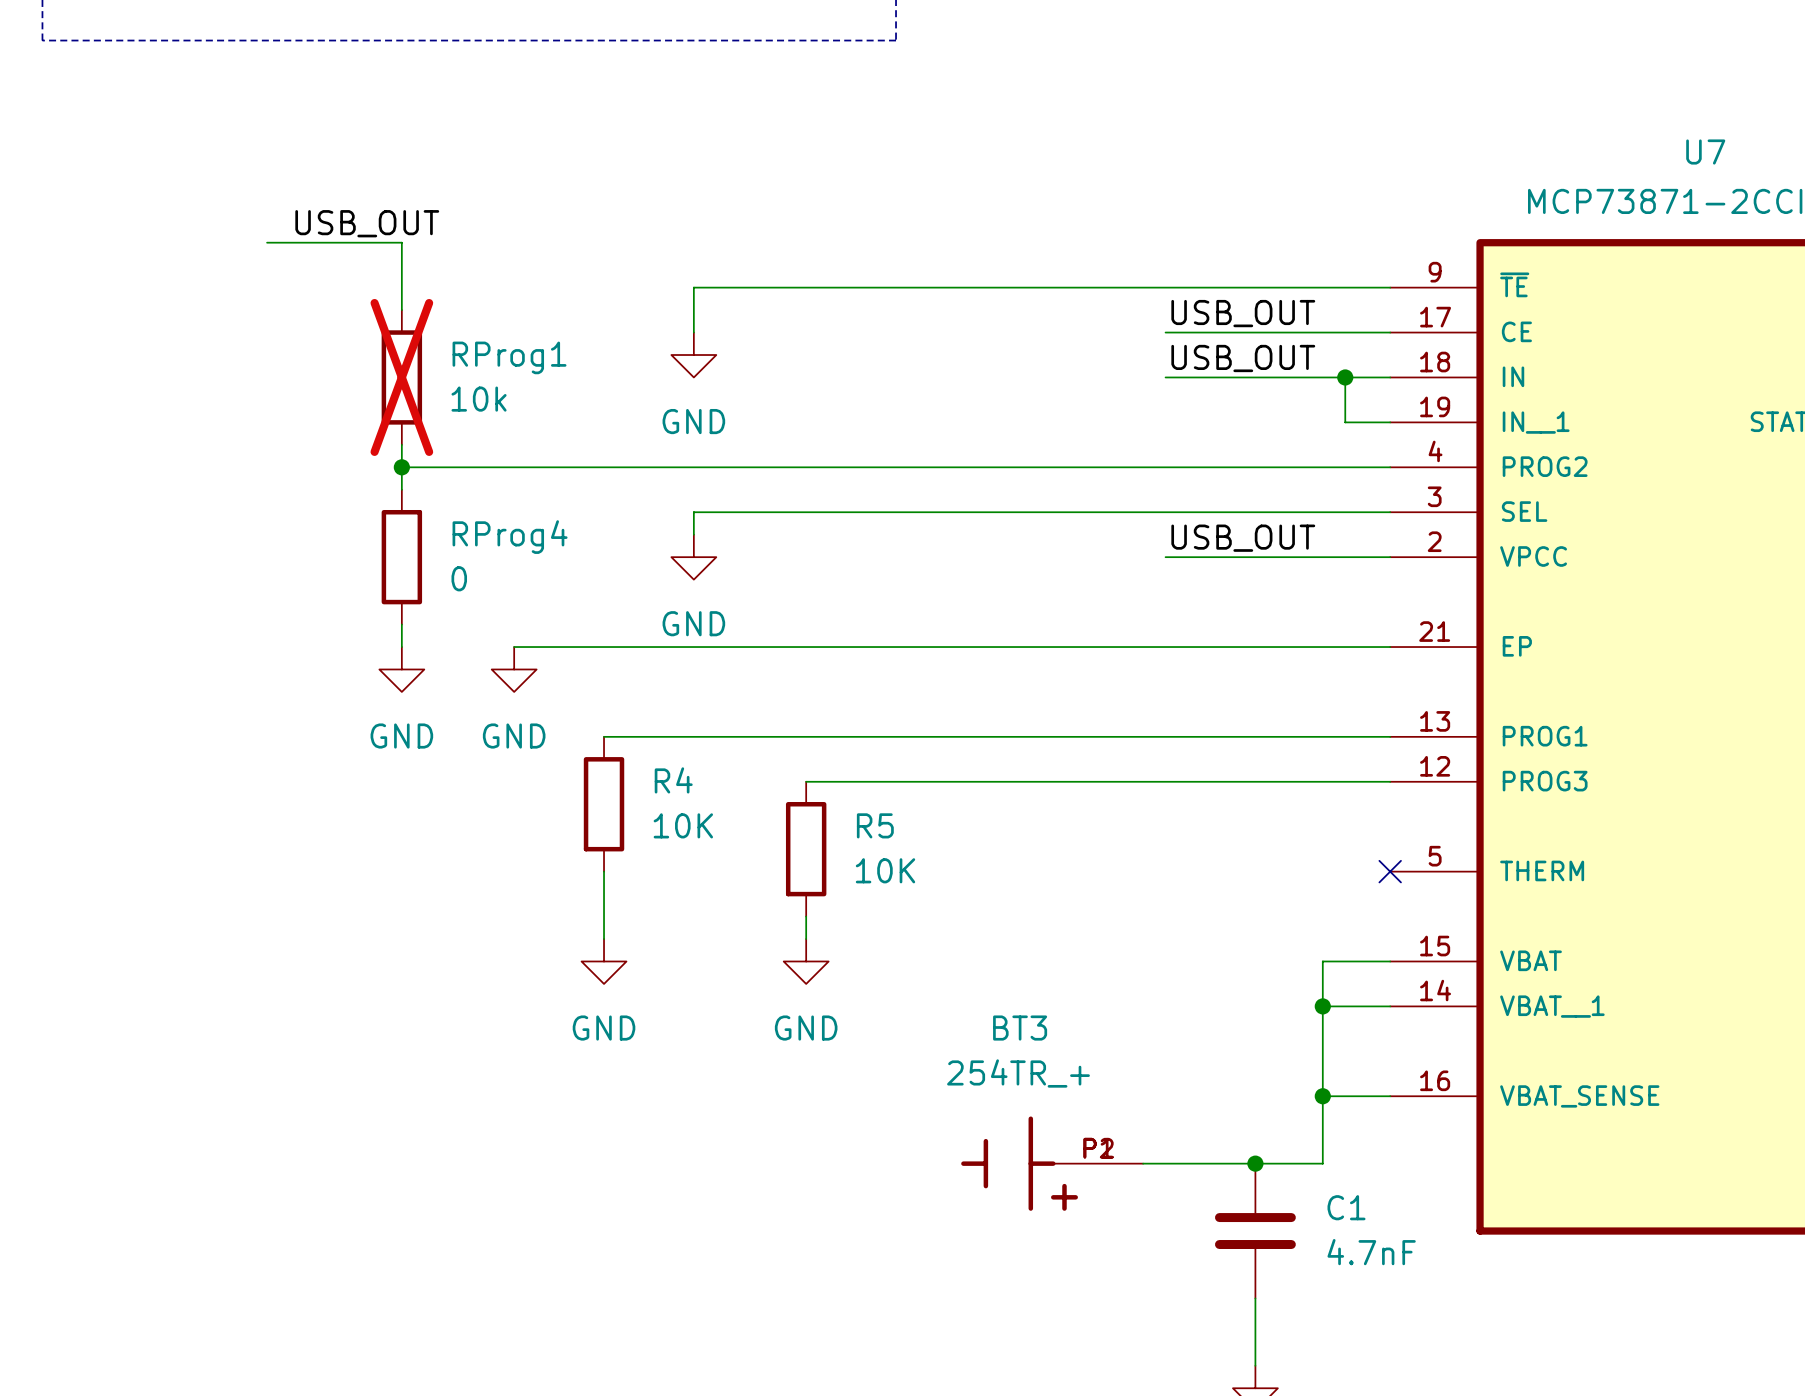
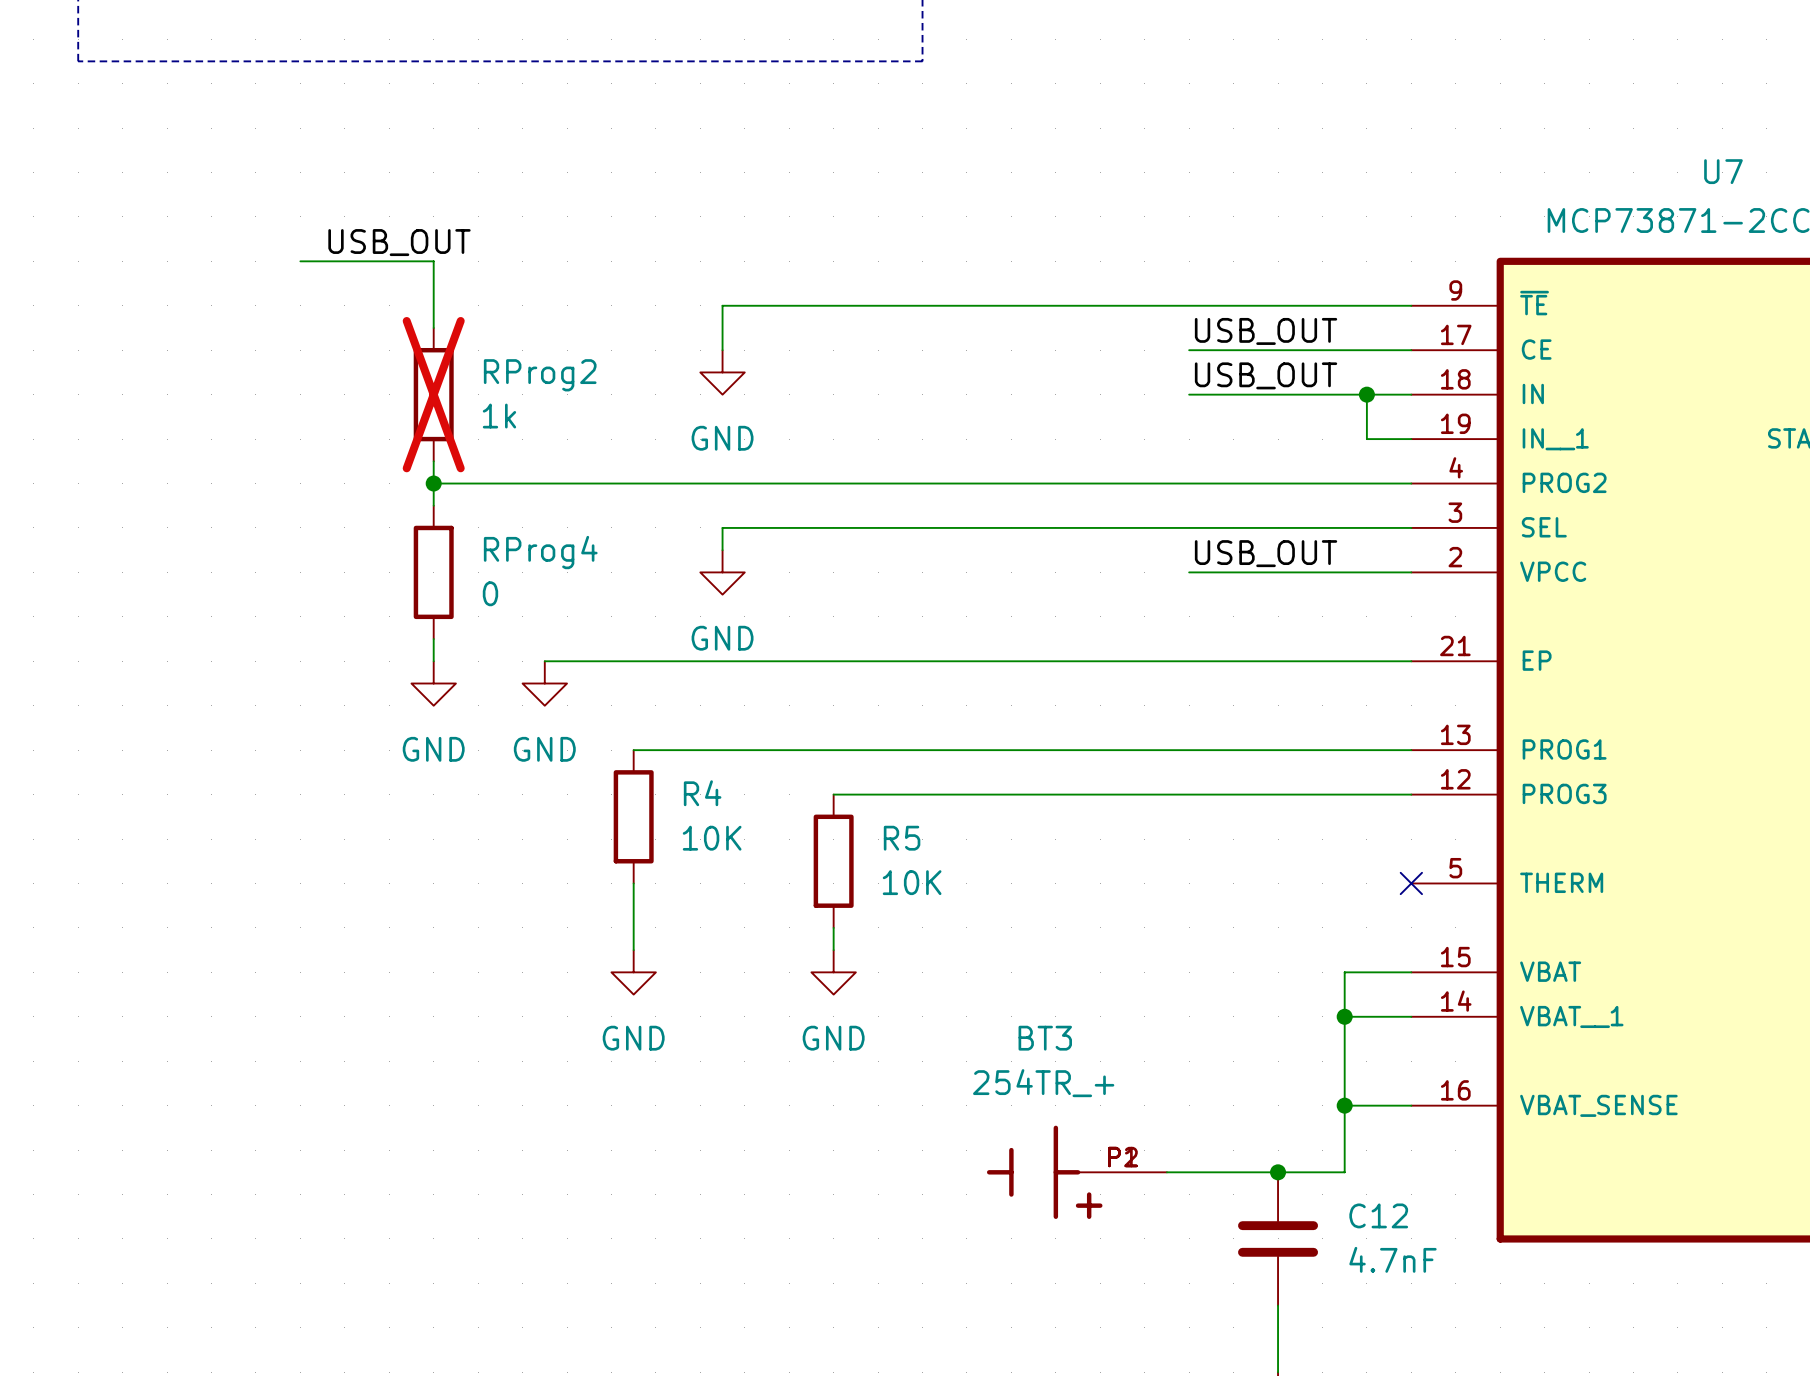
RProg1 name: RProg1 (509, 357) -> RProg2 (540, 375)
RProg1 value: 10k (479, 399) -> 1k (499, 416)
C1 name: C1 (1346, 1207) -> C12 (1378, 1215)

